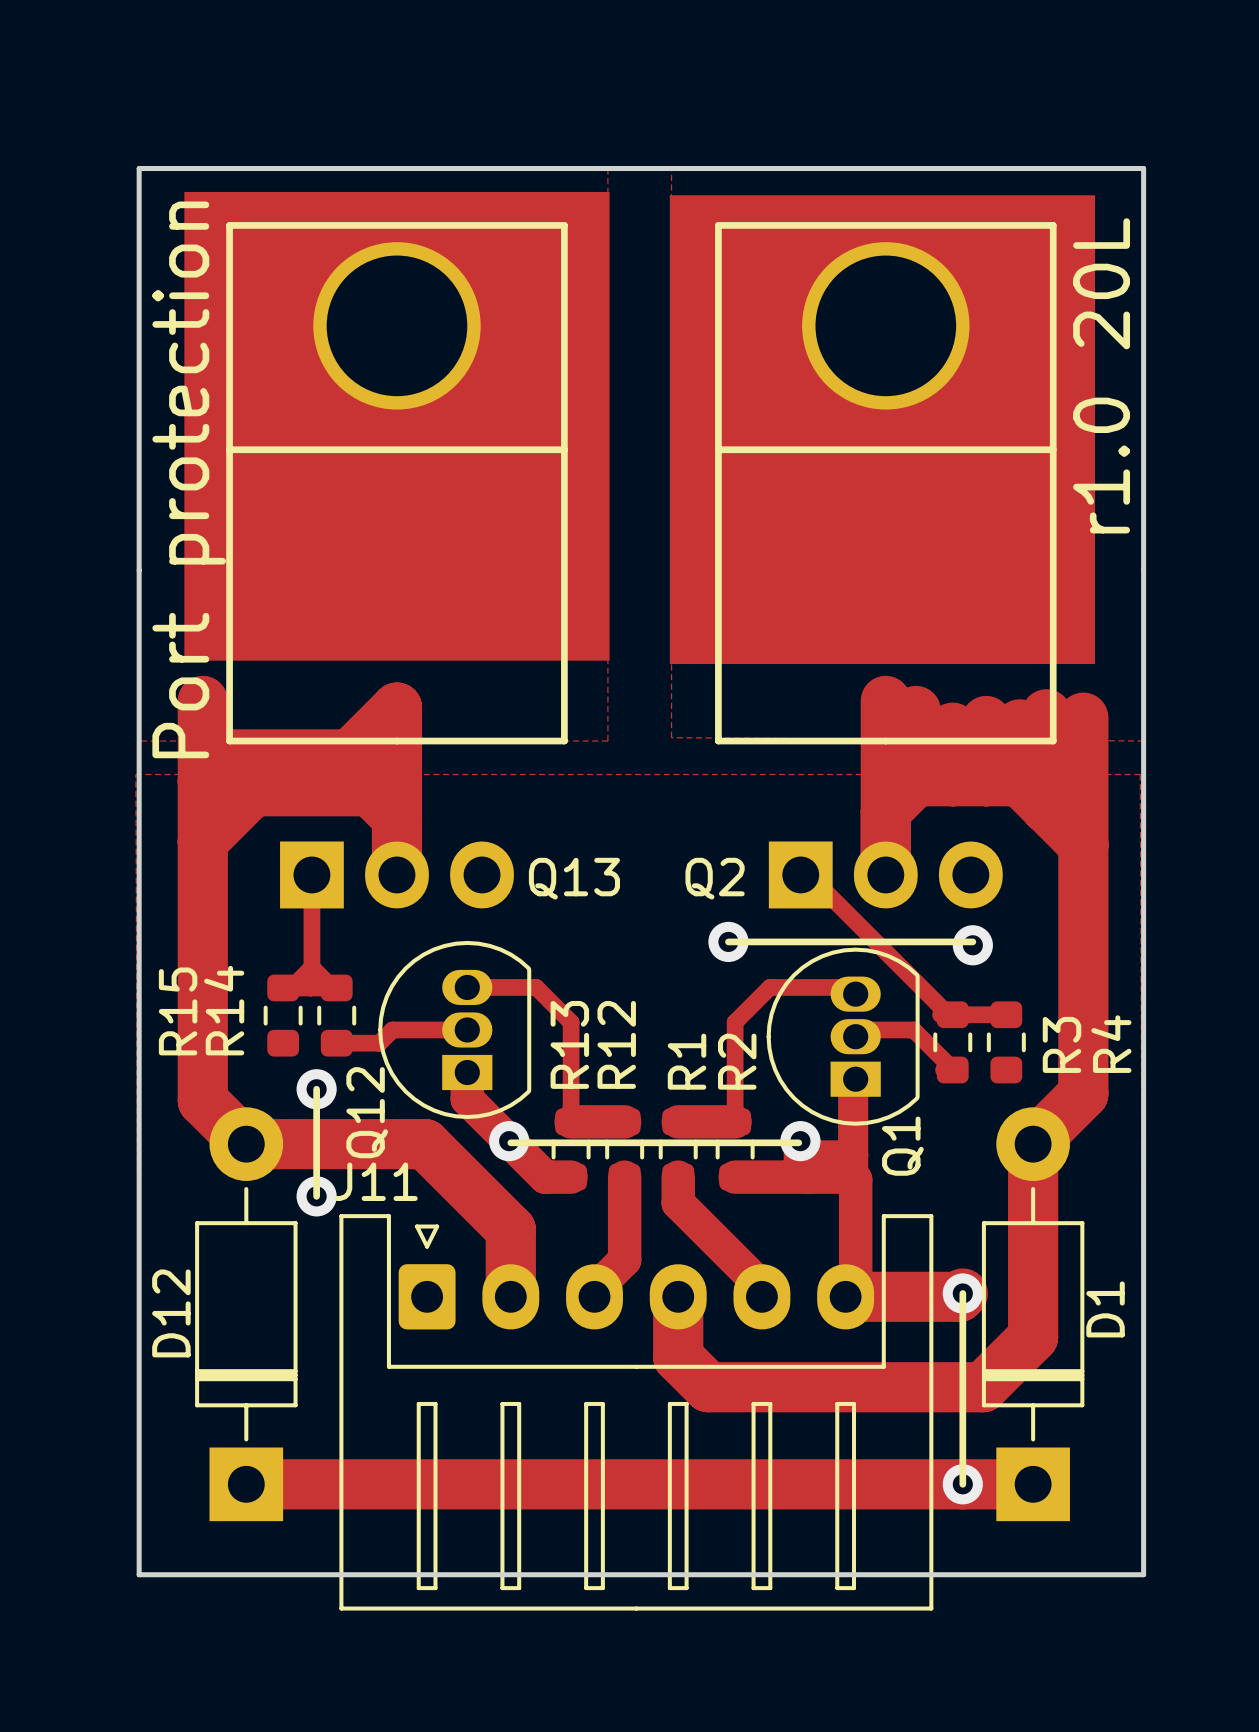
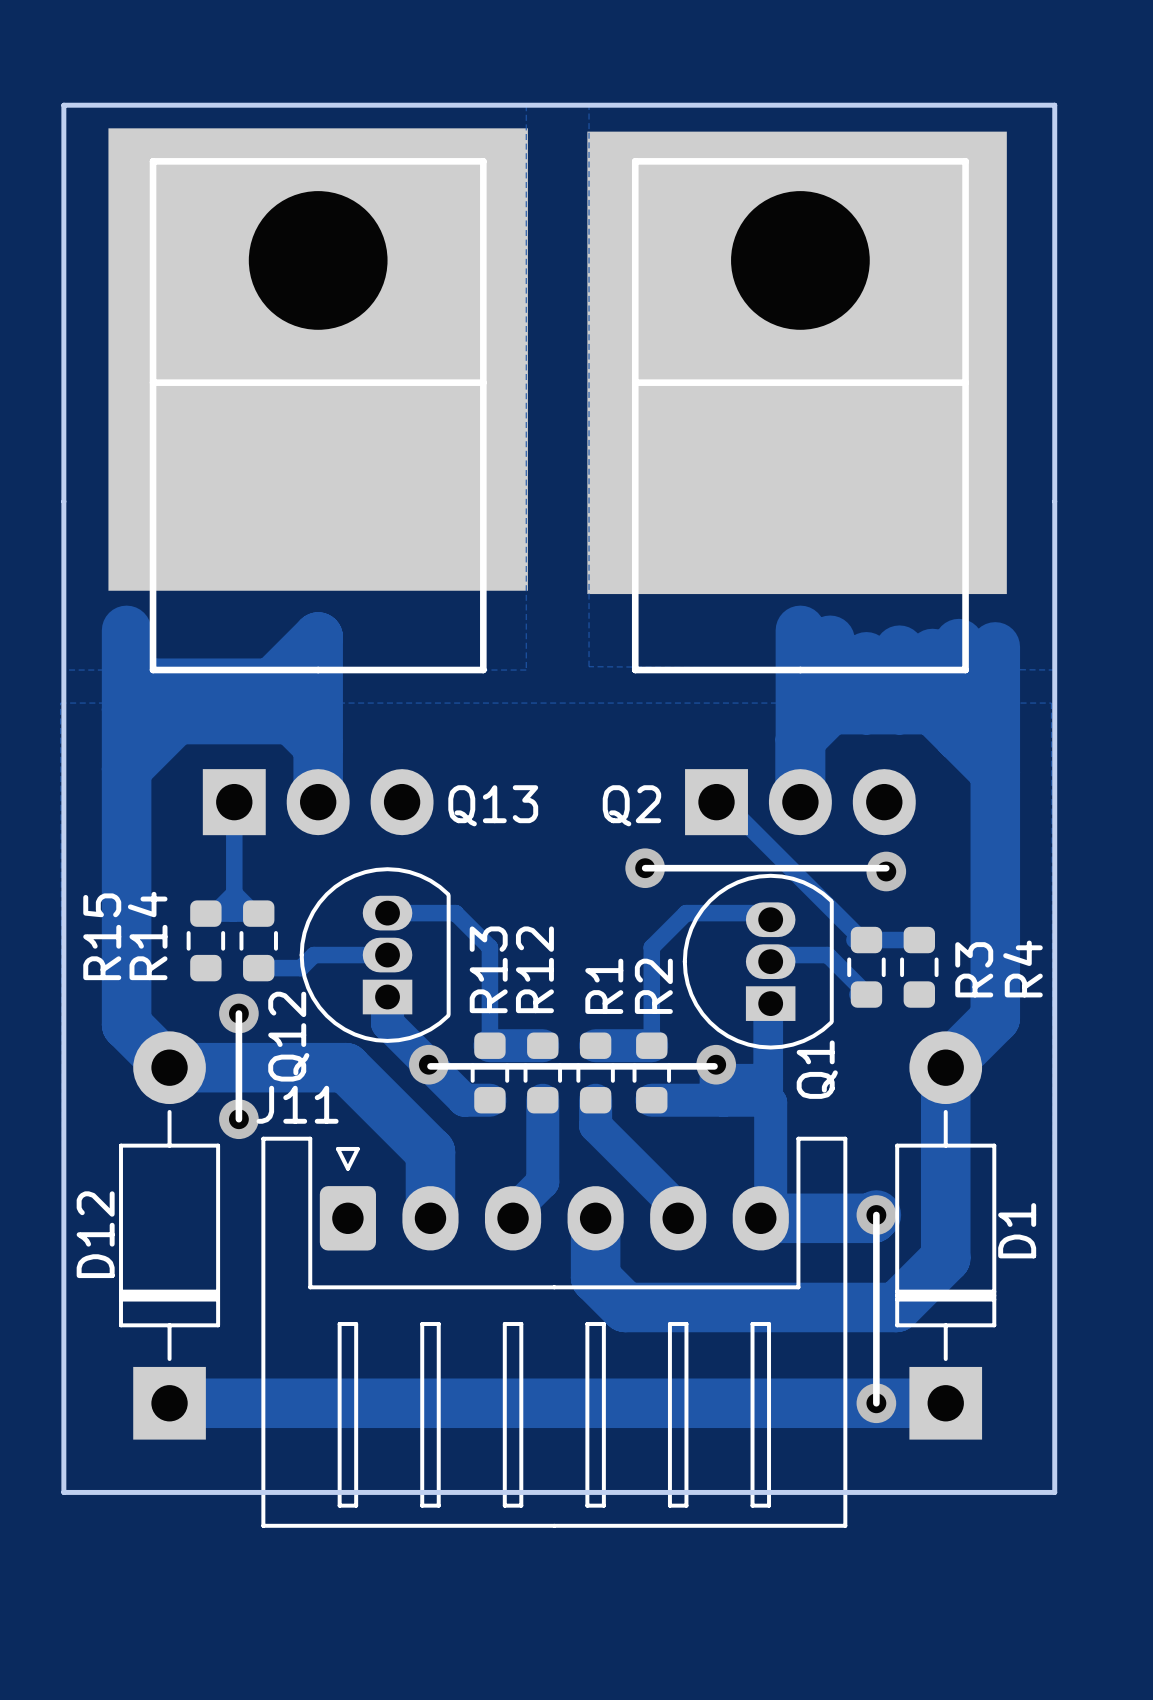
text: r1.0 20L (1101, 375) -> none
text: Port protection (189, 479) -> none

